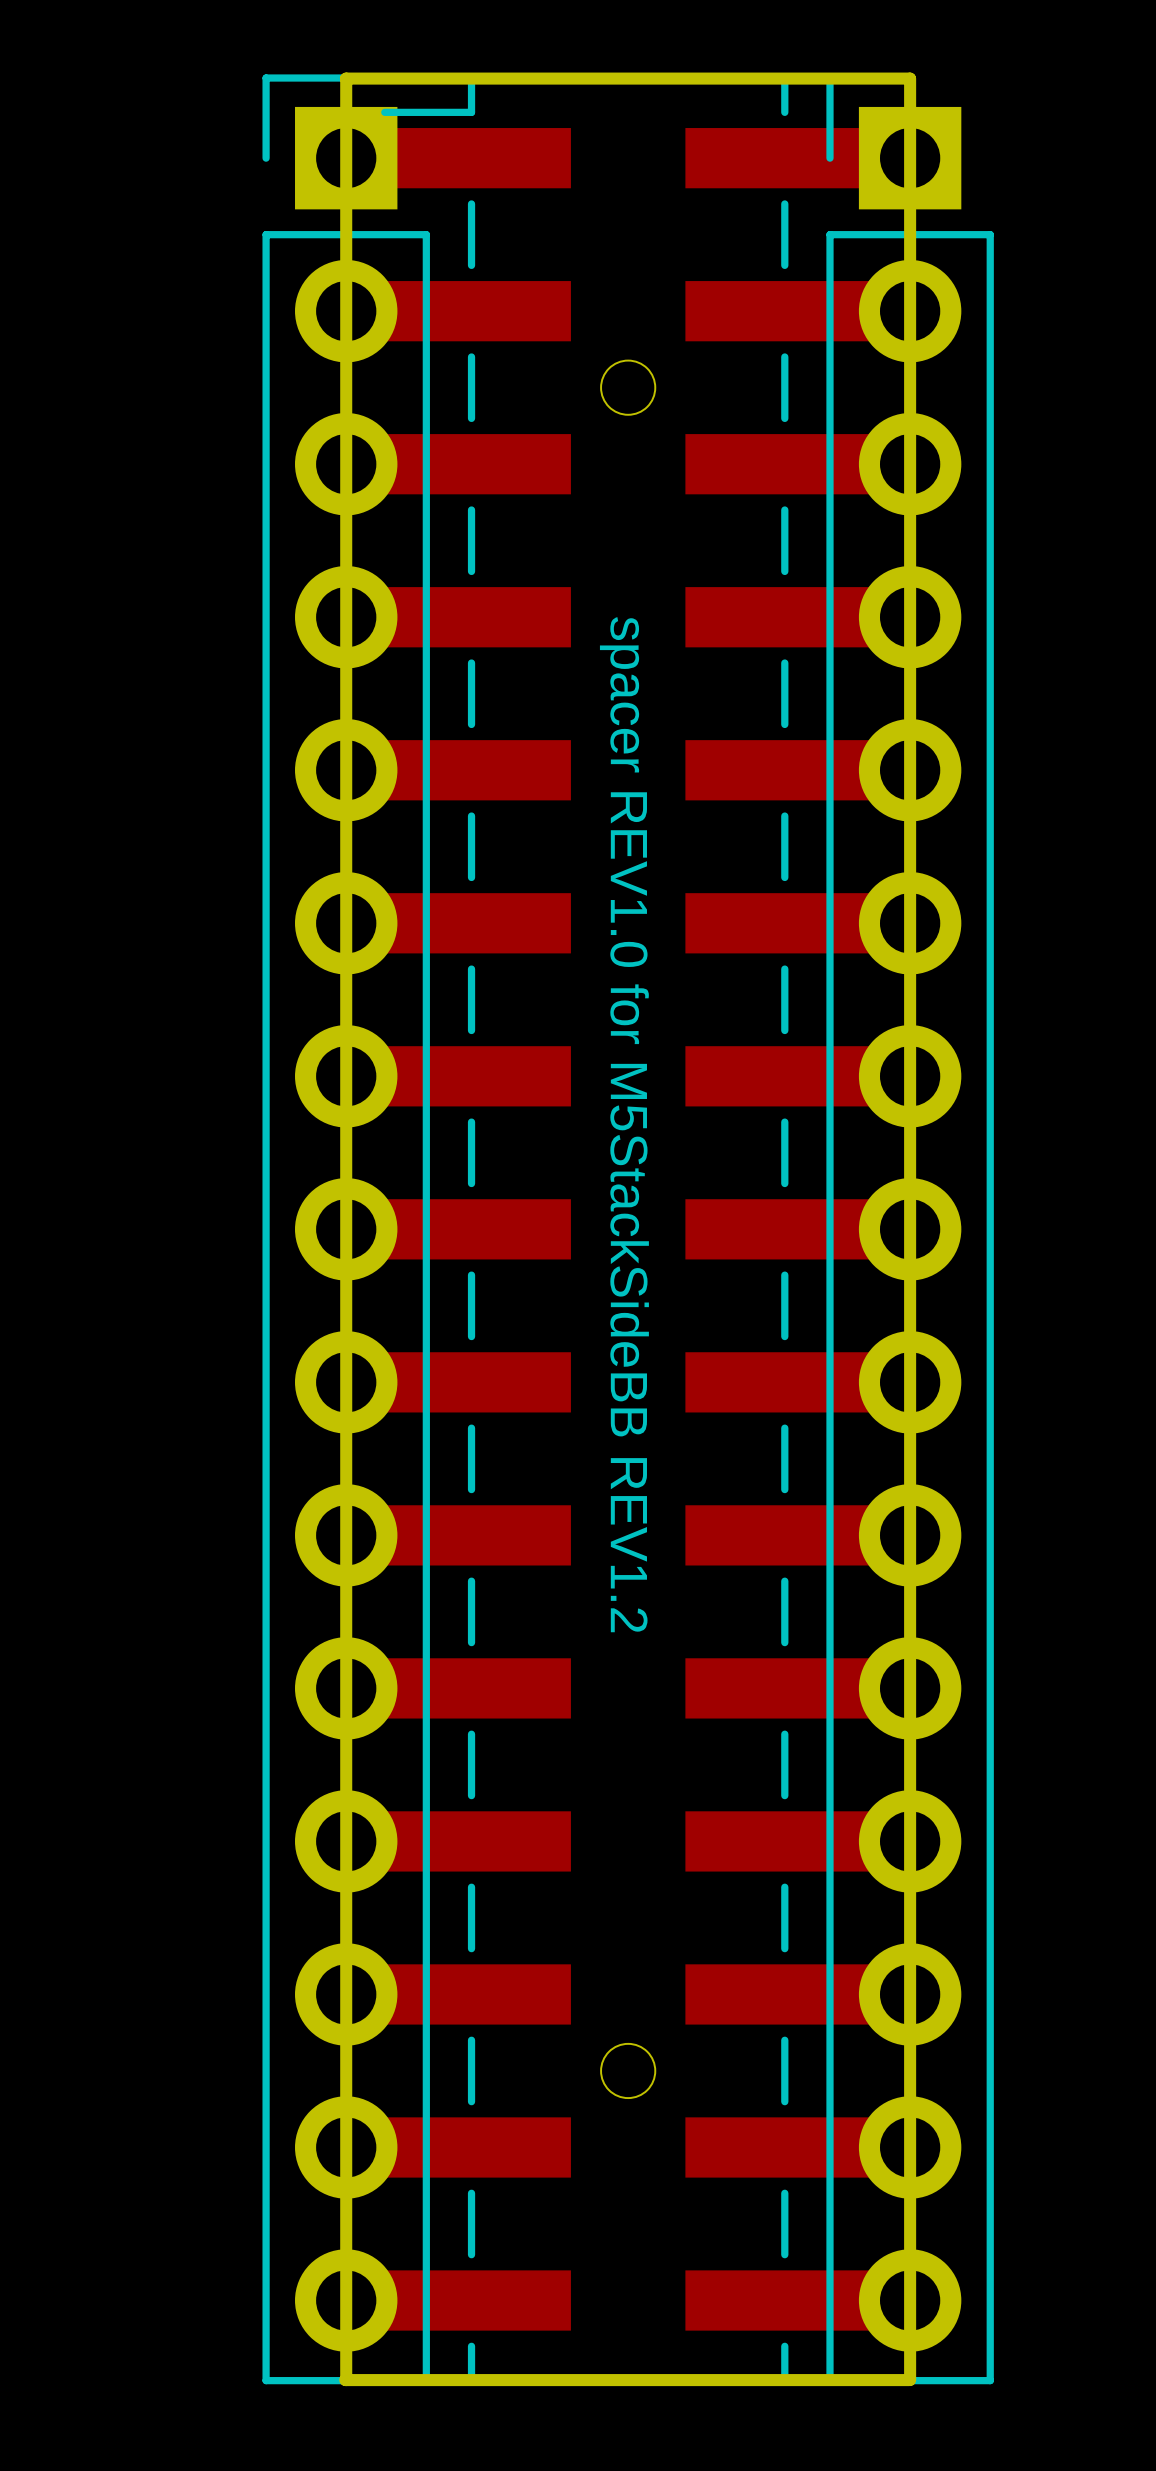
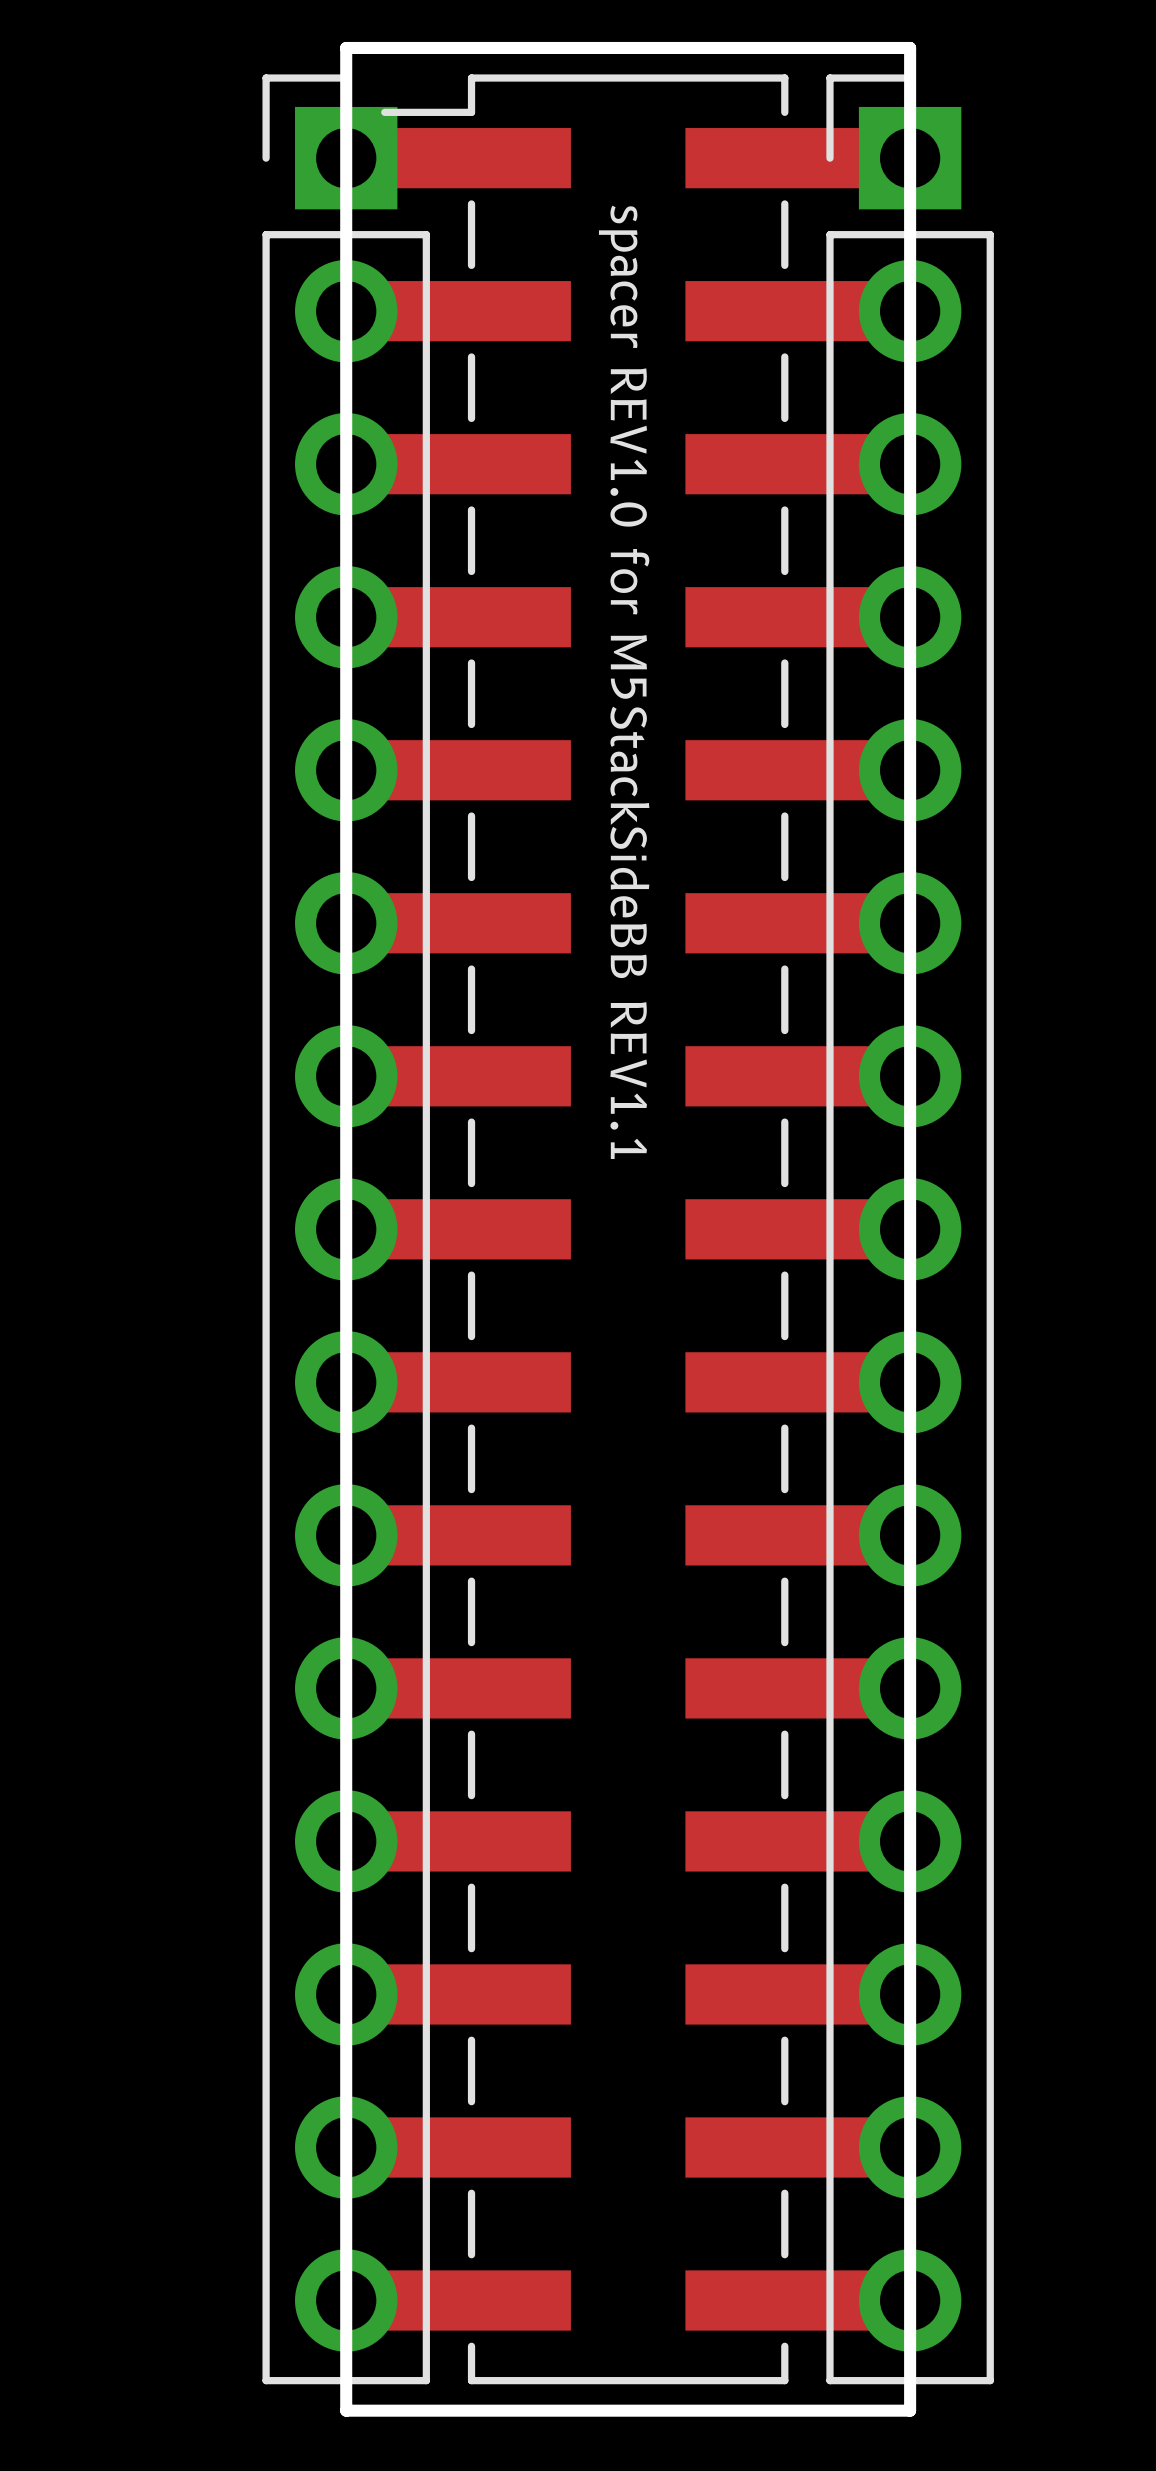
part footprint: [381, 74, 876, 2385] -> [381, 74, 876, 2385]
board edge: (345, 78) (909, 78) -> (346, 78) (346, 47) (910, 47) (910, 78)
text: spacer REV1.0 for M5StackSideBB REV1.2 (624, 1124) -> spacer REV1.0 for M5StackSideBB REV1.1 (624, 682)
board edge: (345, 2380) (909, 2380) -> (346, 2380) (346, 2410) (910, 2410) (910, 2380)

